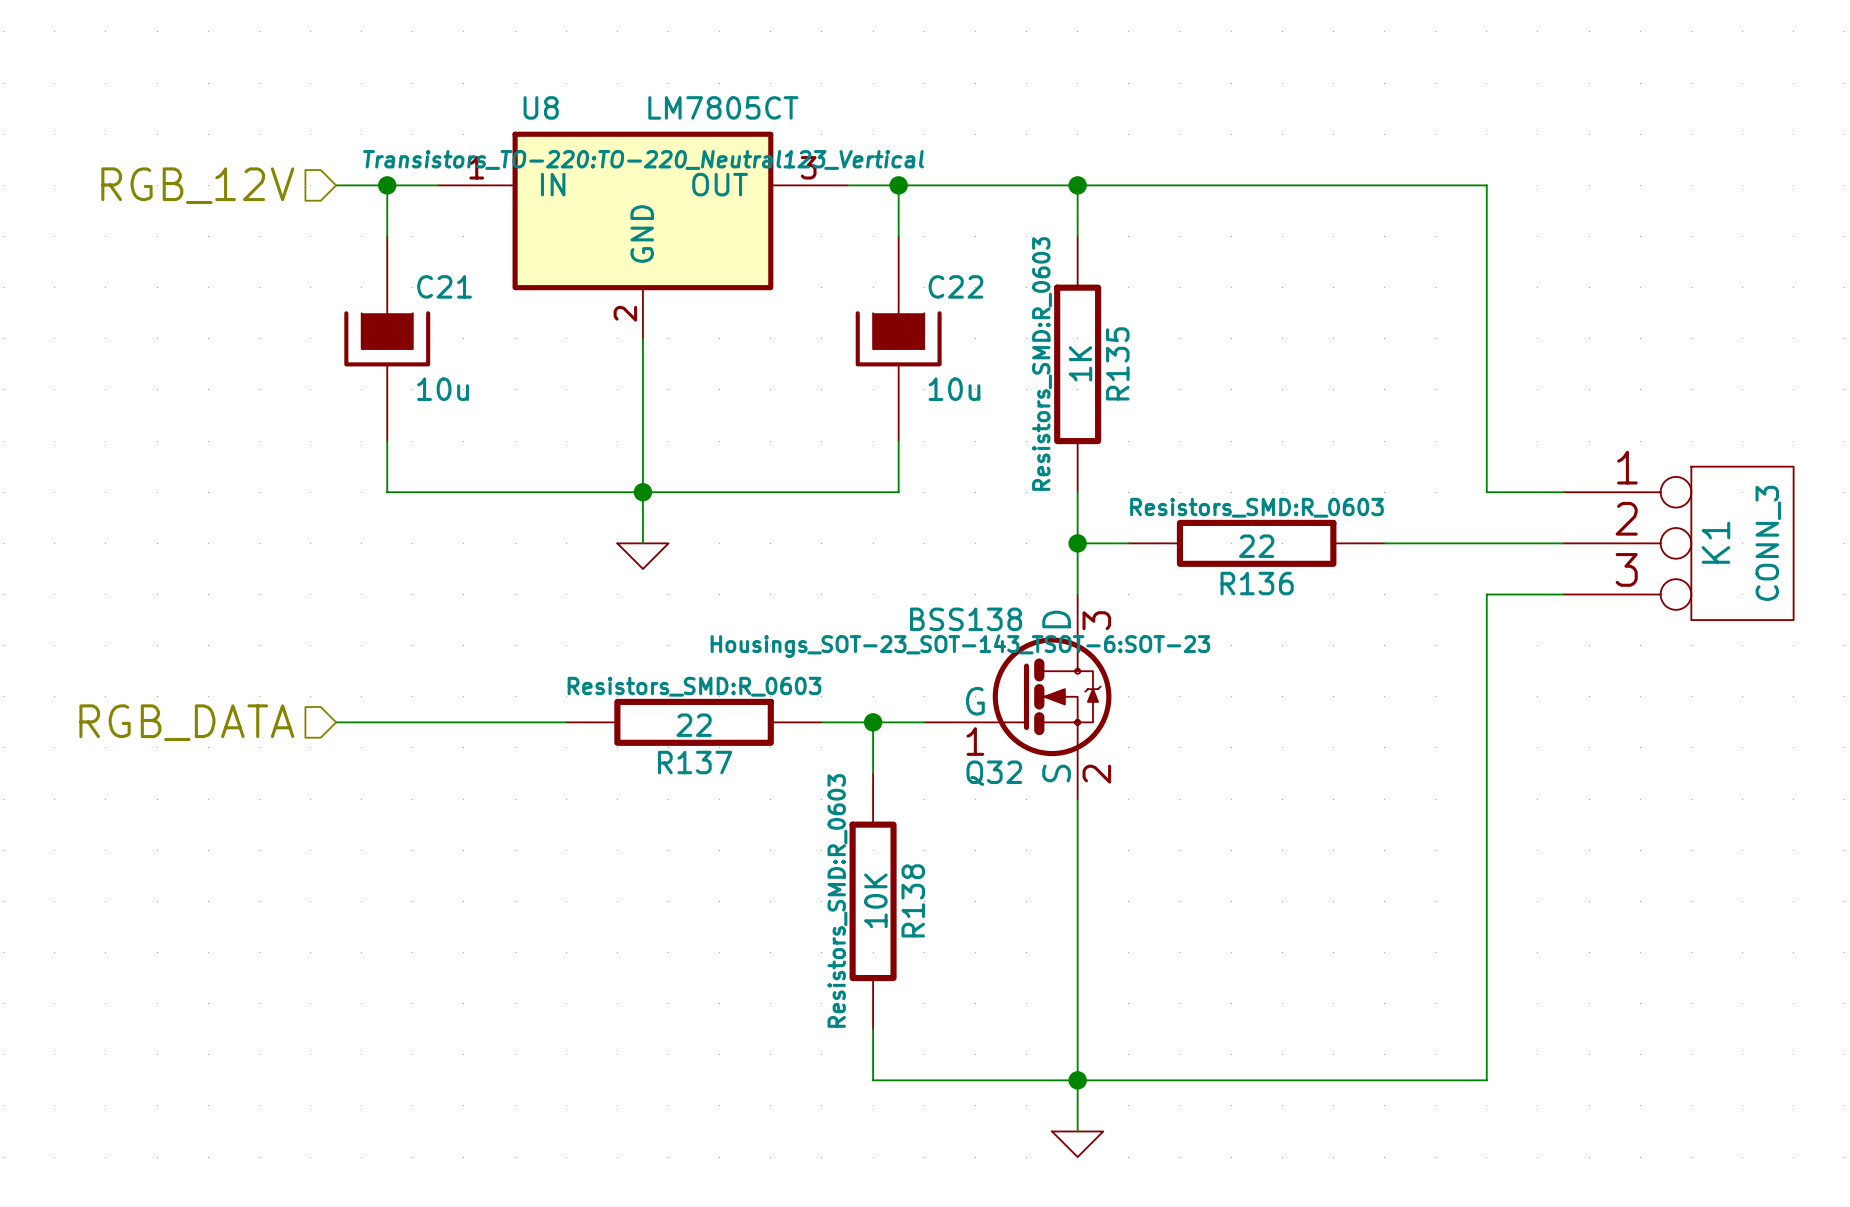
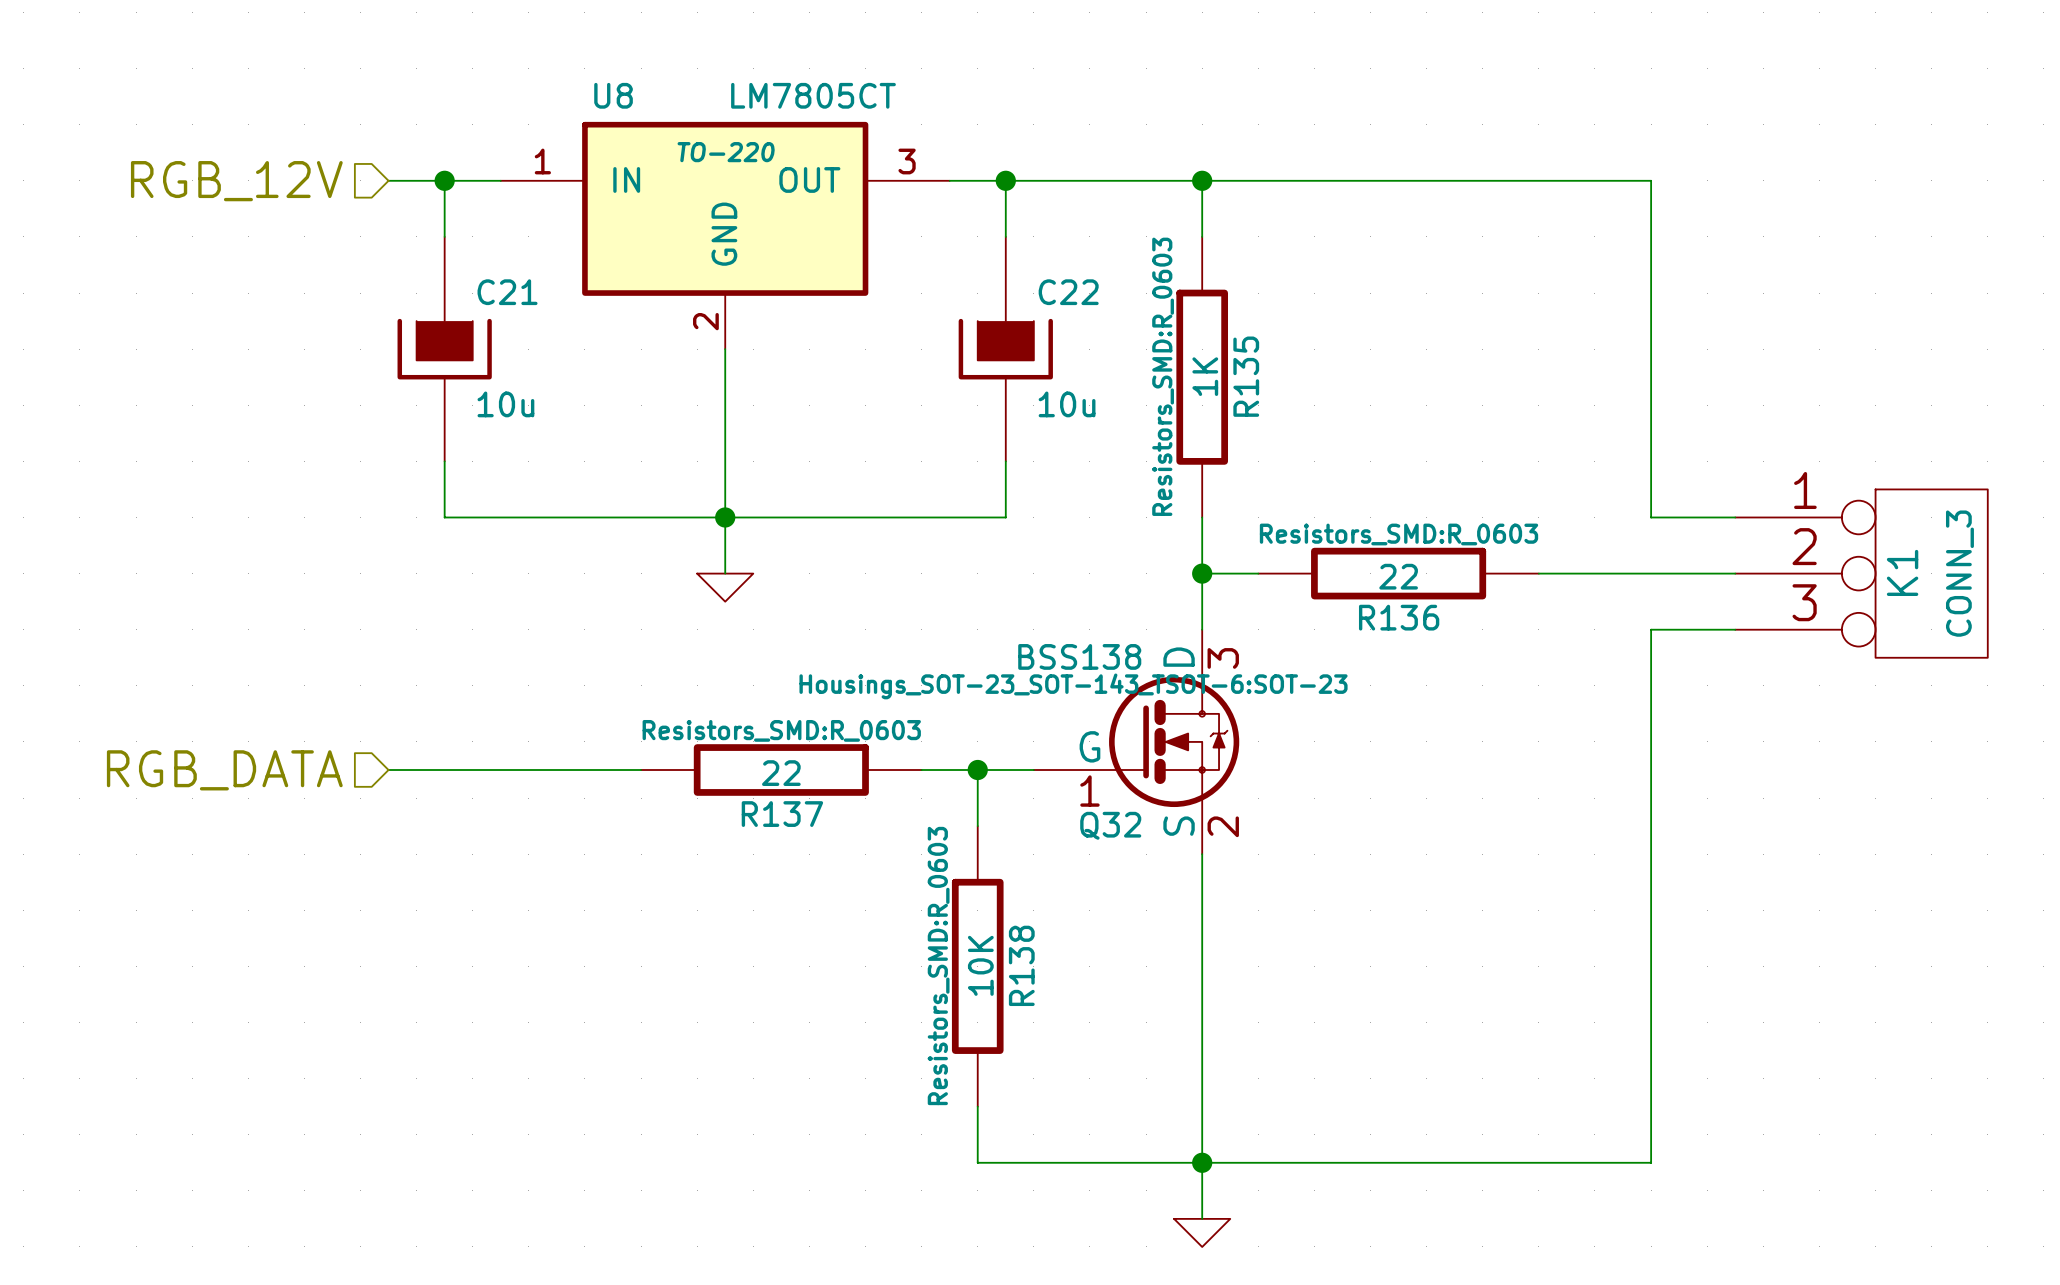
U8 text: Transistors_TO-220:TO-220_Neutral123_Vertical (643, 159) -> TO-220 (726, 152)

